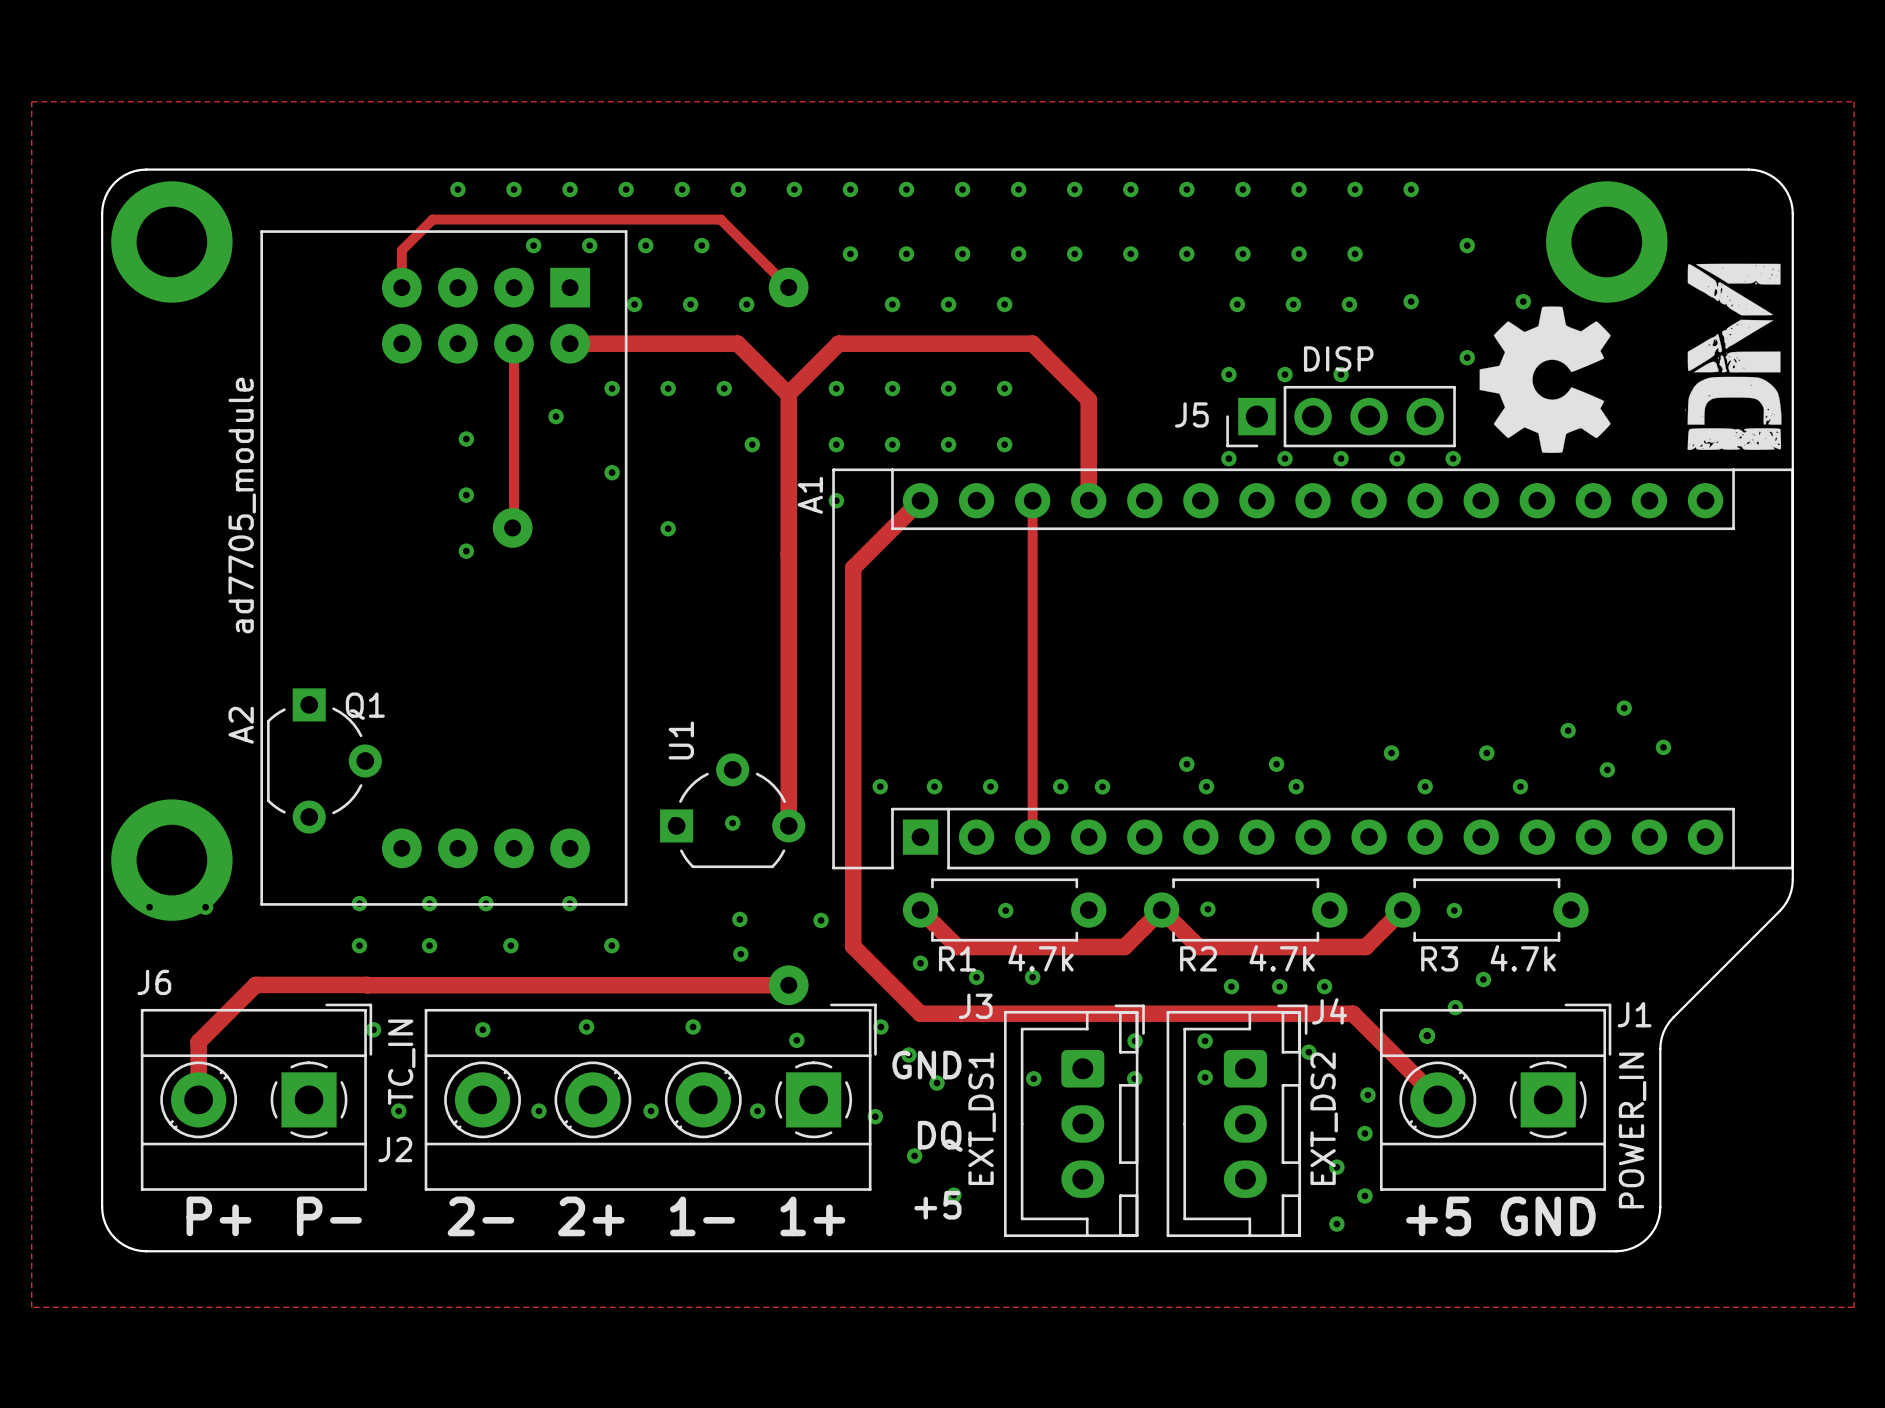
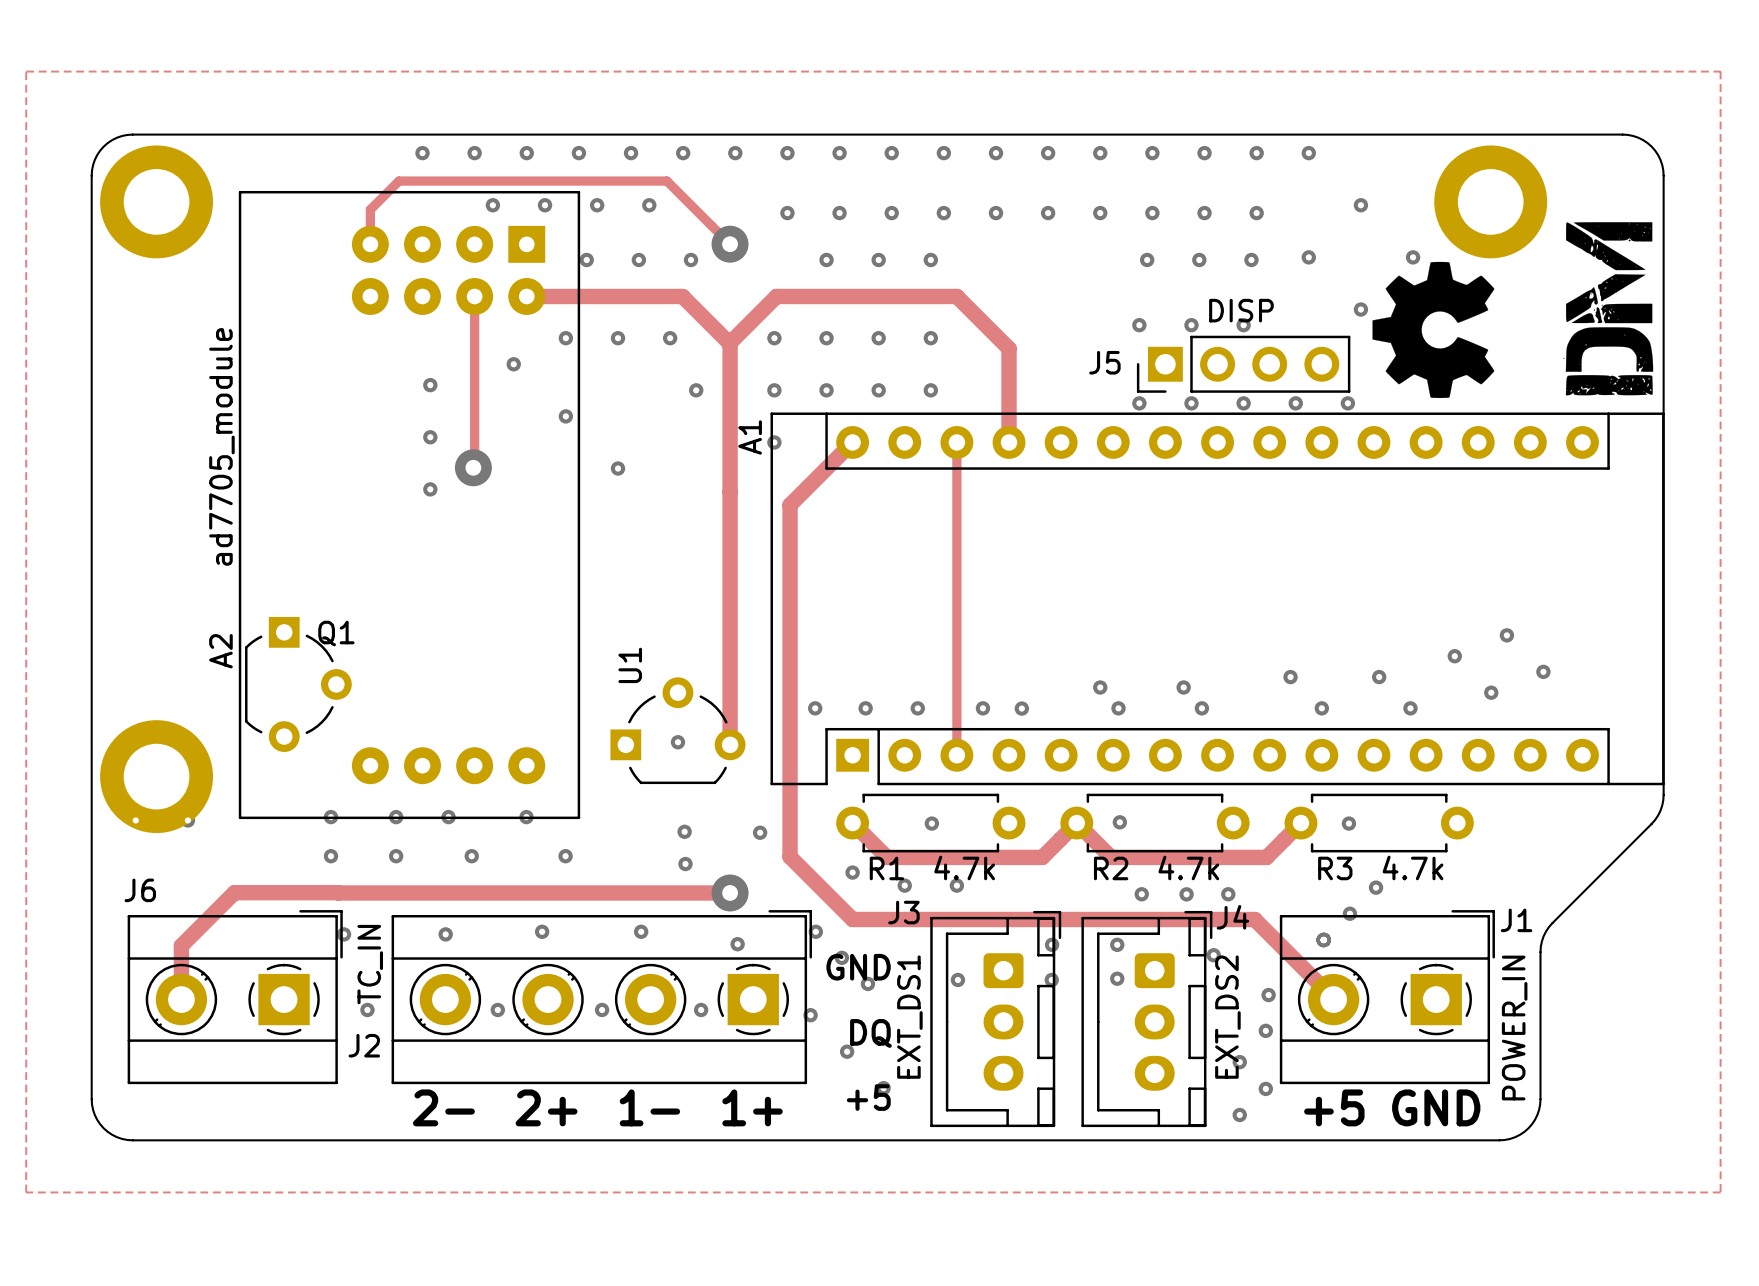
text: P+ (219, 1216) -> none
text: P- (329, 1216) -> none

